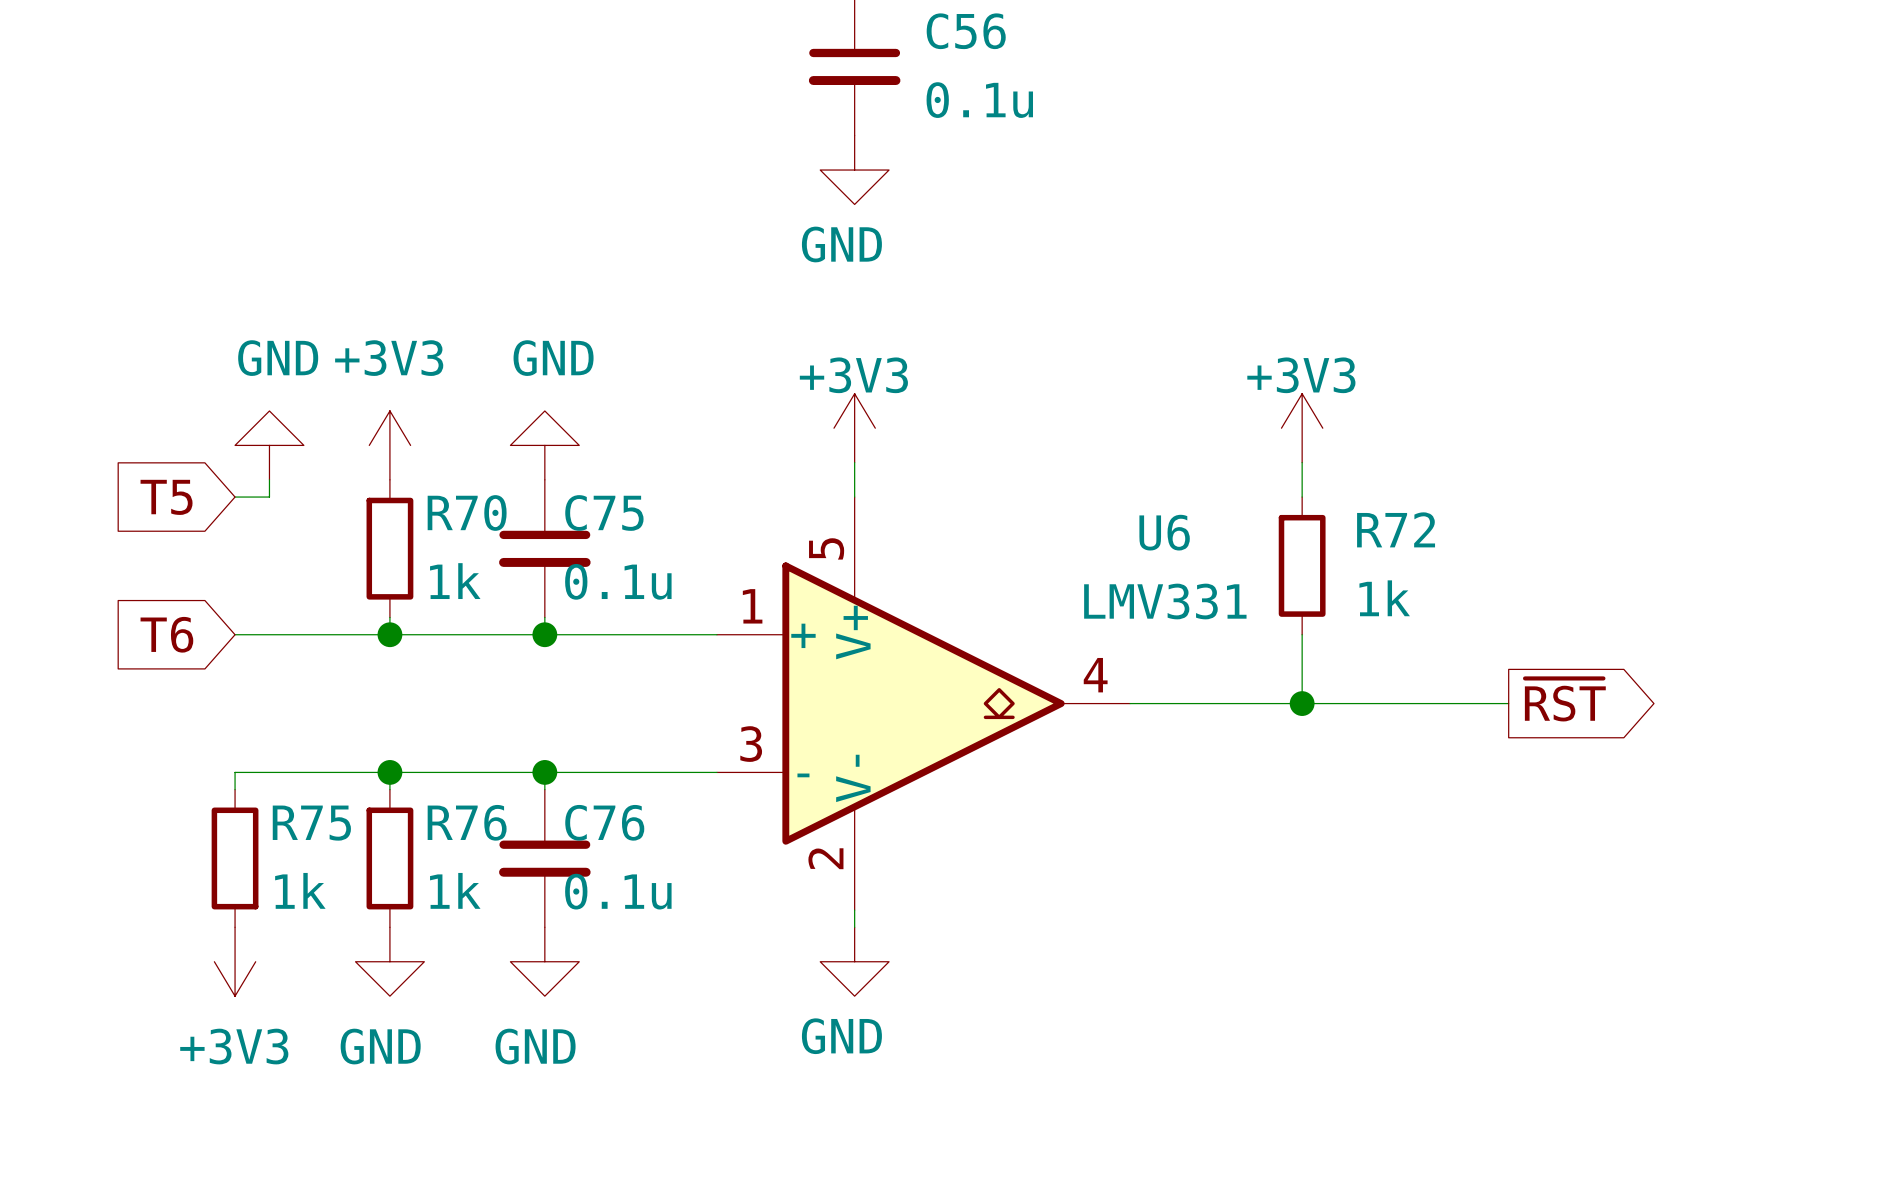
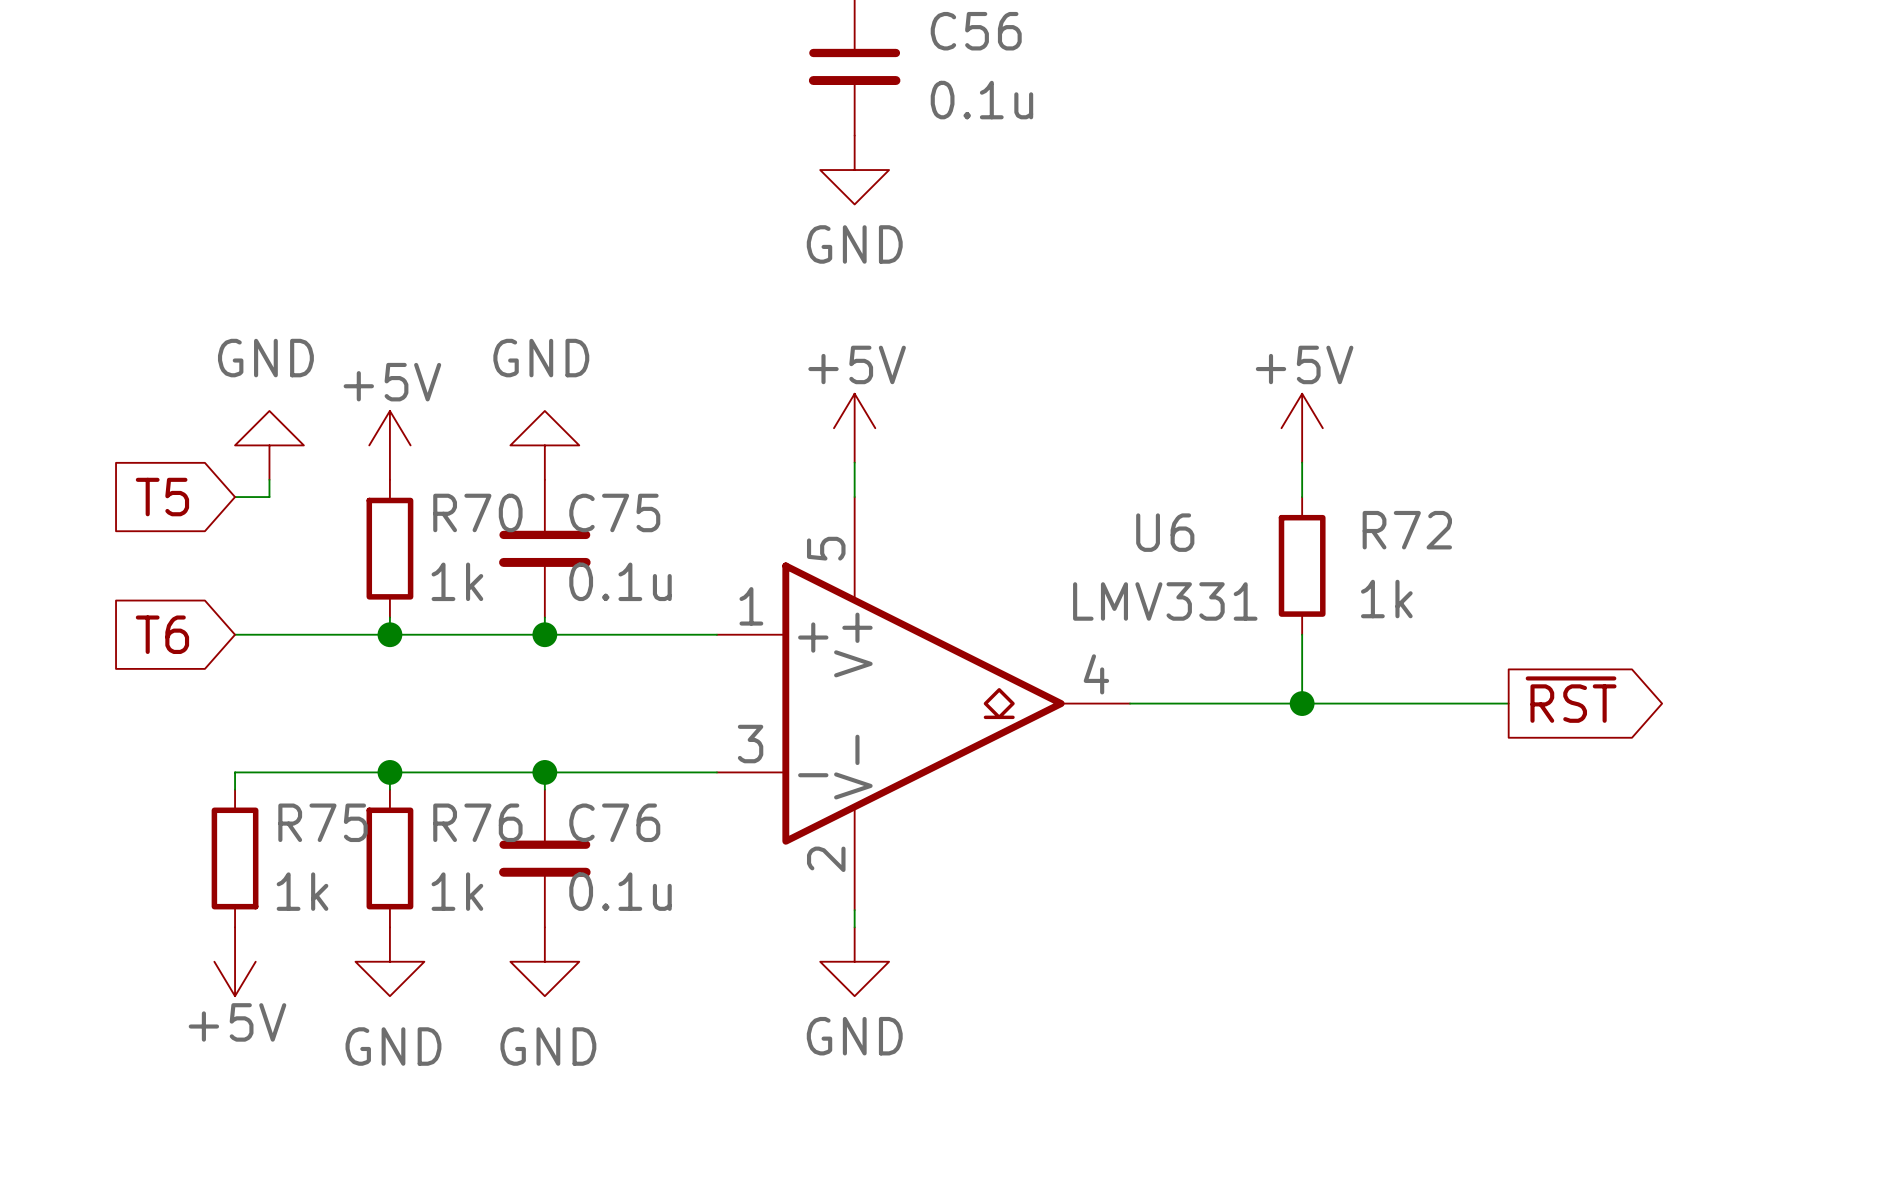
power symbol: +3V3 (854, 428) -> +5V (854, 428)
power symbol: +3V3 (1302, 428) -> +5V (1302, 428)
power symbol: +3V3 (389, 445) -> +5V (389, 445)
power symbol: +3V3 (235, 961) -> +5V (235, 961)

